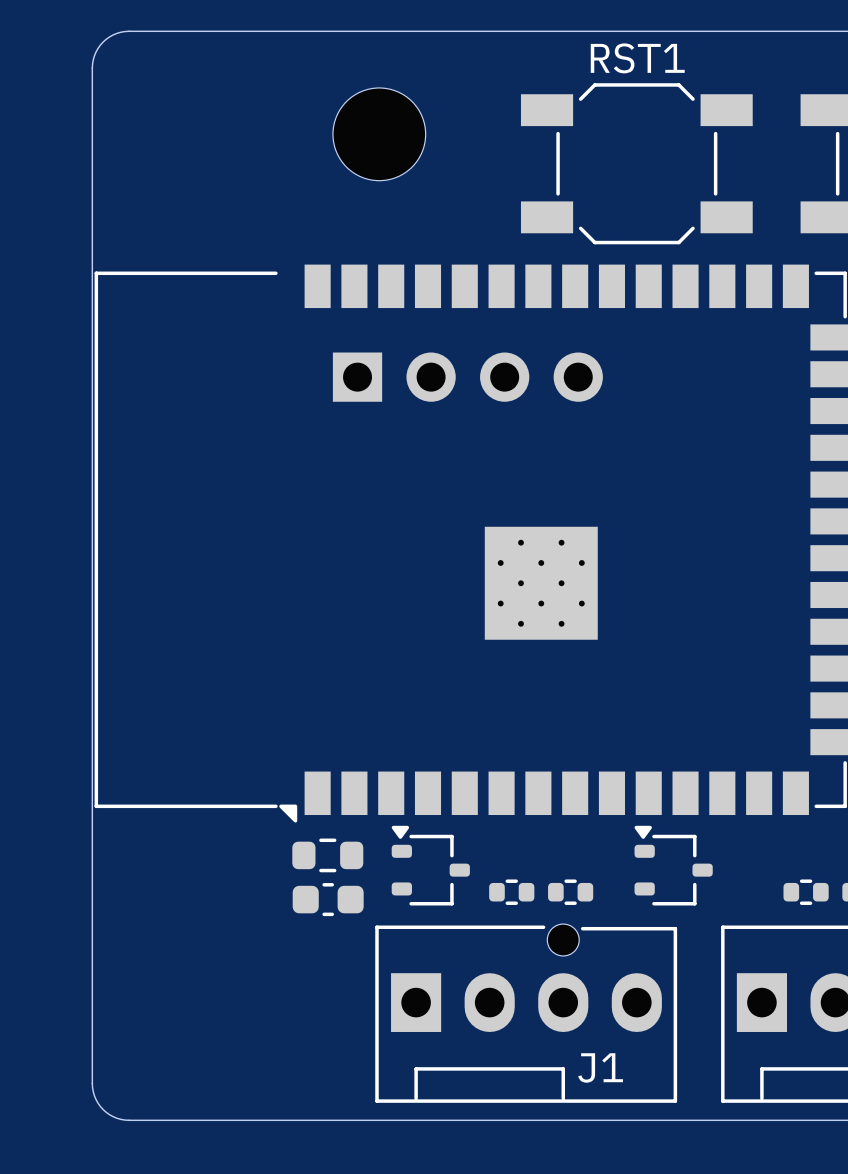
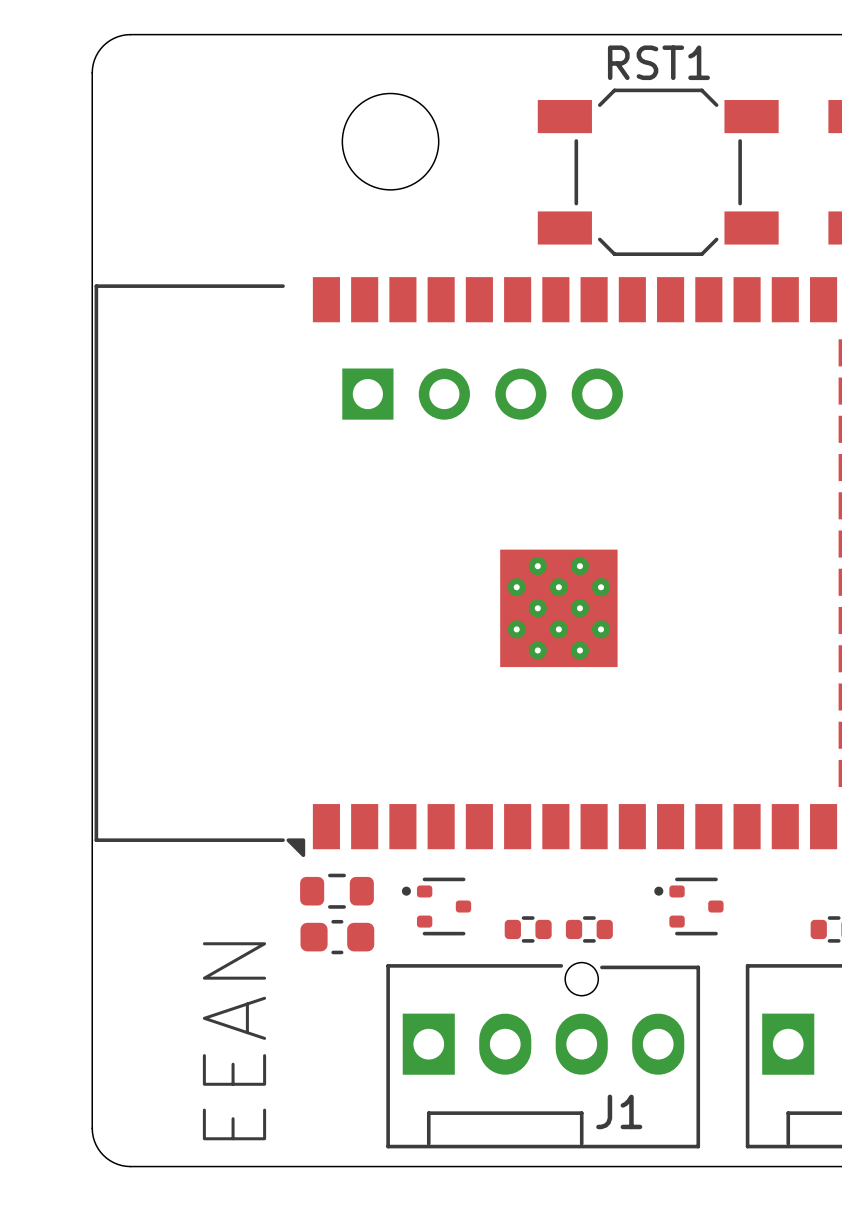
part footprint: [391, 825, 470, 906] -> [401, 877, 472, 936]
part footprint: [634, 825, 713, 906] -> [654, 877, 724, 936]
text: none -> EEAN (234, 1041)

